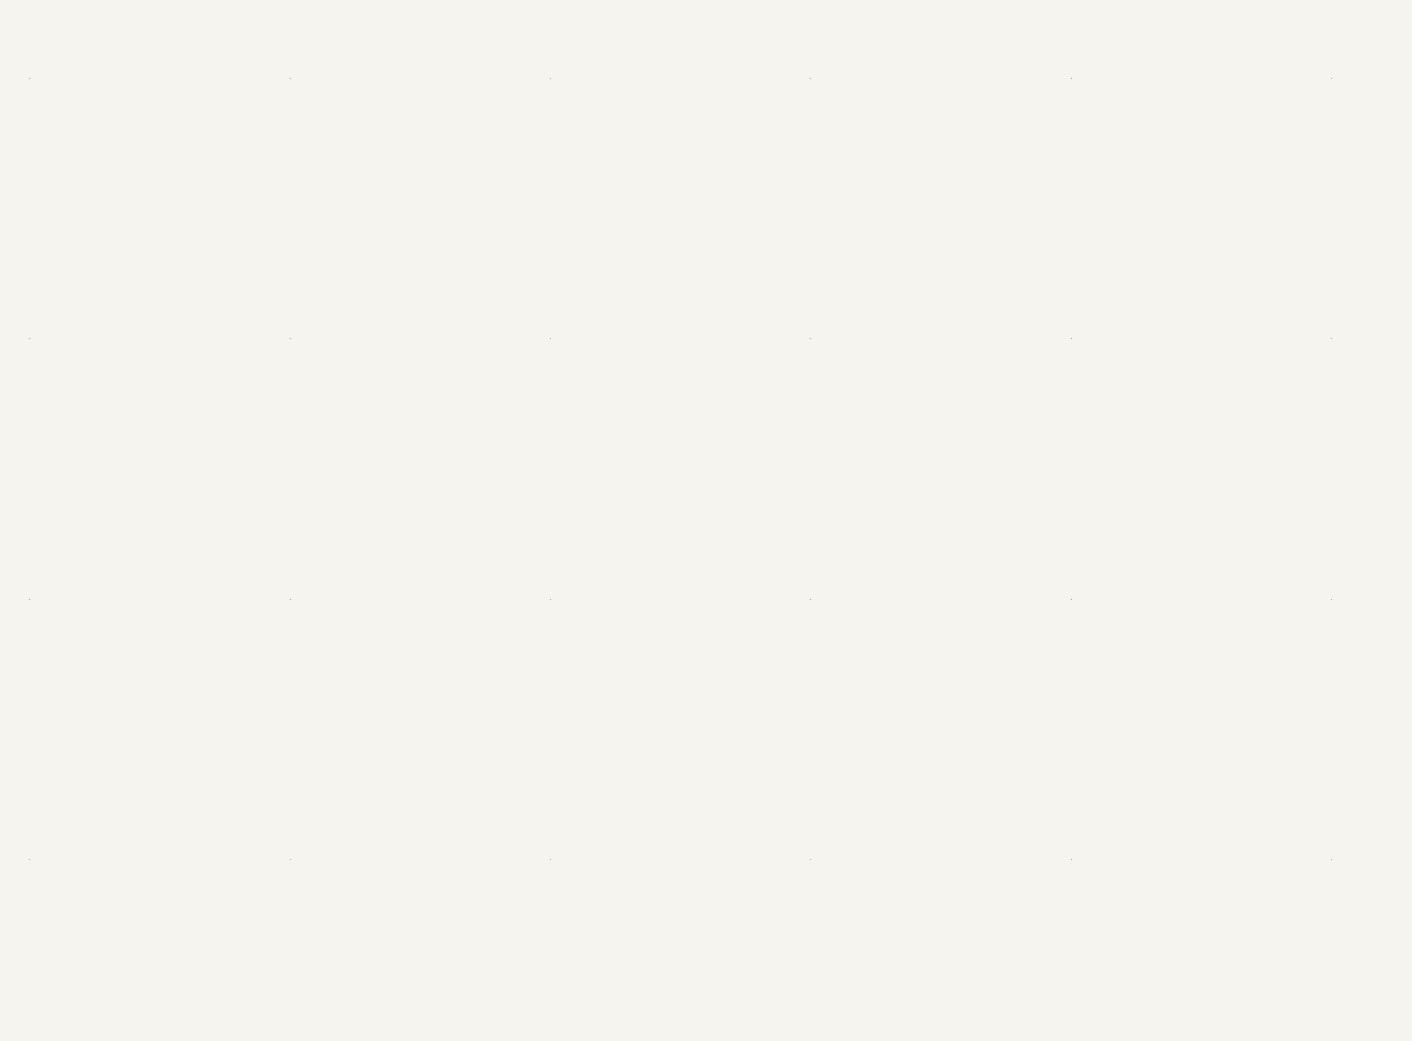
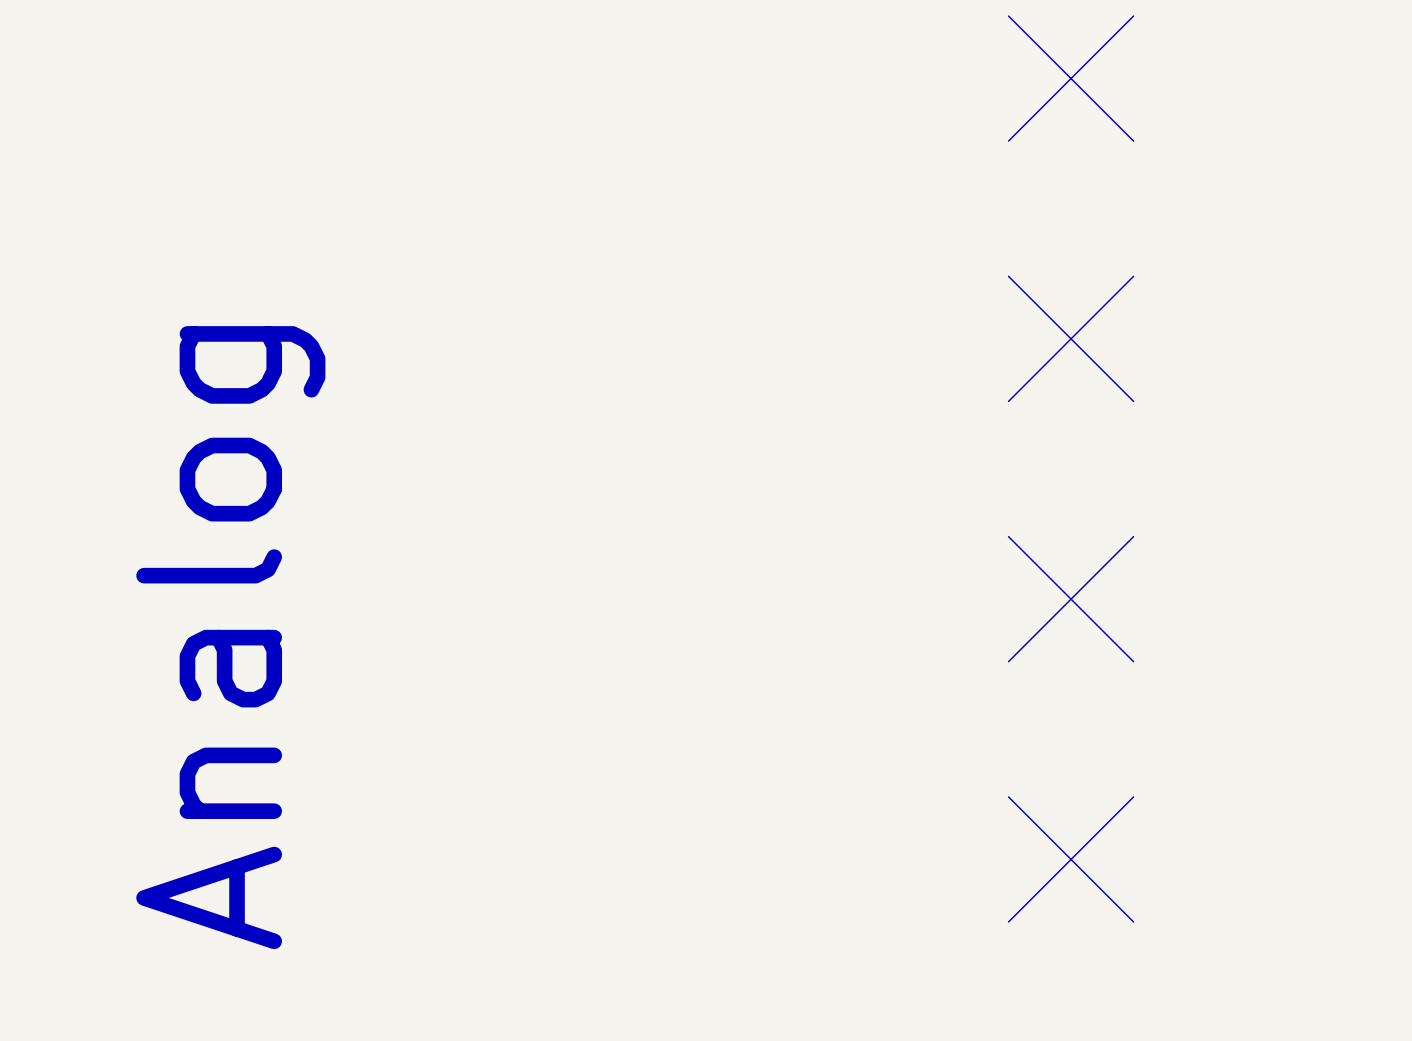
no-connect mark: none -> (1071, 78)
no-connect mark: none -> (1071, 338)
no-connect mark: none -> (1071, 599)
text: none -> Analog (230, 637)
no-connect mark: none -> (1071, 859)

